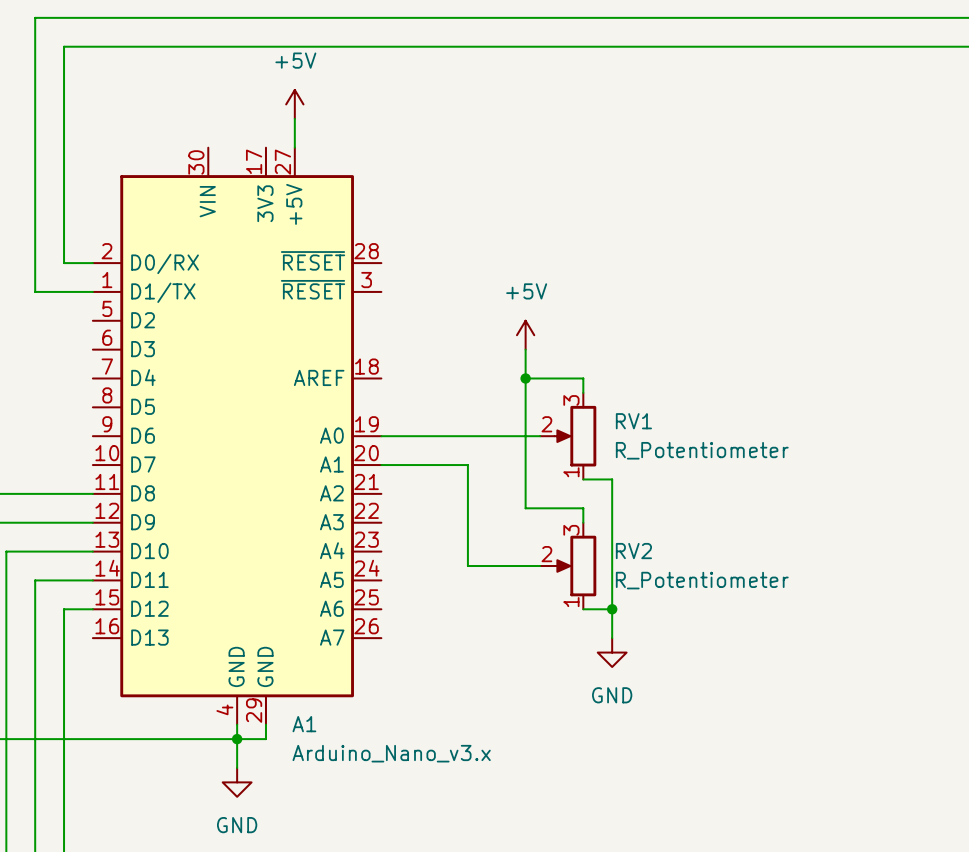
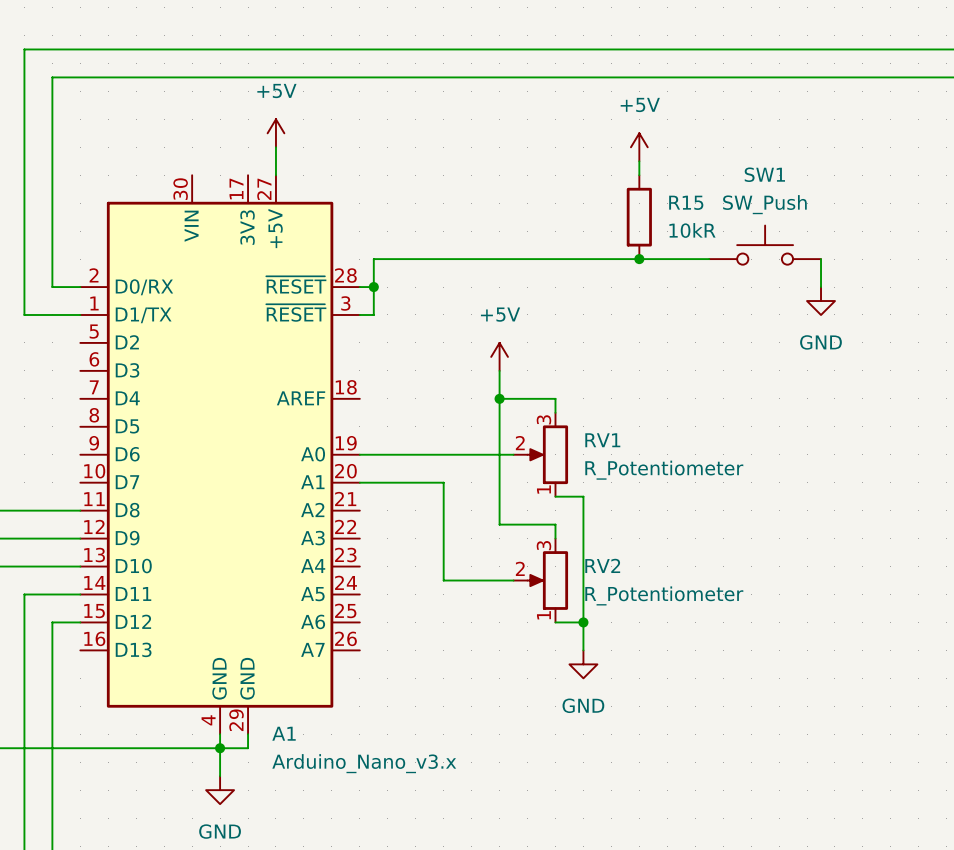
power symbol: none -> +5V (639, 147)
wire: none -> (639, 161) (639, 175)
R15: none -> 10kR (639, 217)
SW1: none -> SW_Push (765, 245)
junction: none -> (639, 259)
wire: none -> (709, 259) (373, 259) (373, 314) (359, 314)
wire: none -> (821, 259) (821, 287)
wire: none -> (359, 287) (373, 287)
junction: none -> (373, 287)
power symbol: none -> GND (821, 301)

